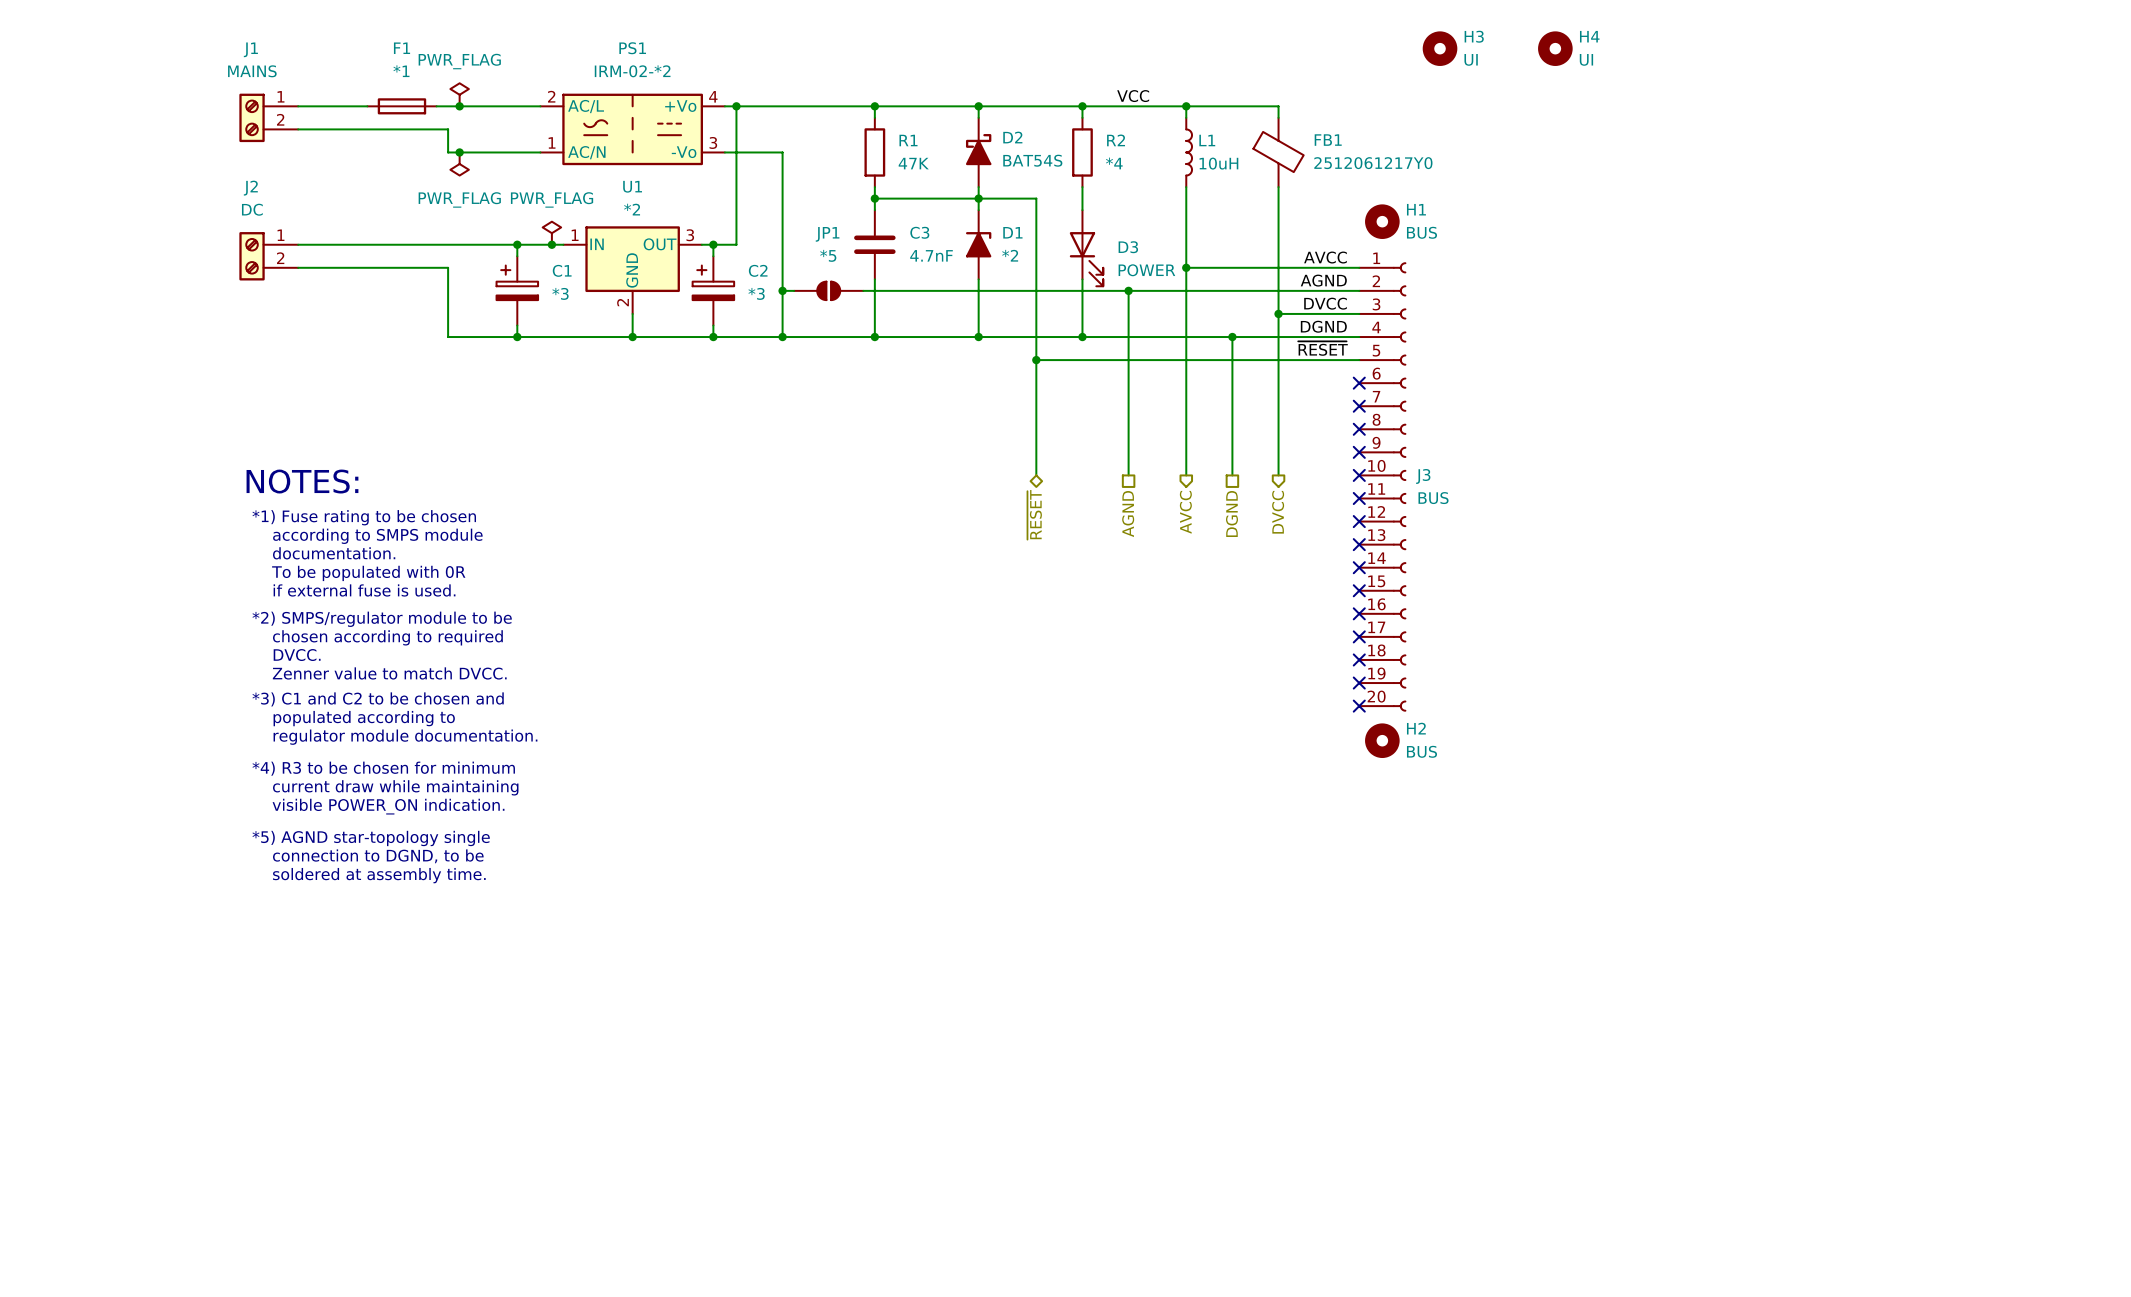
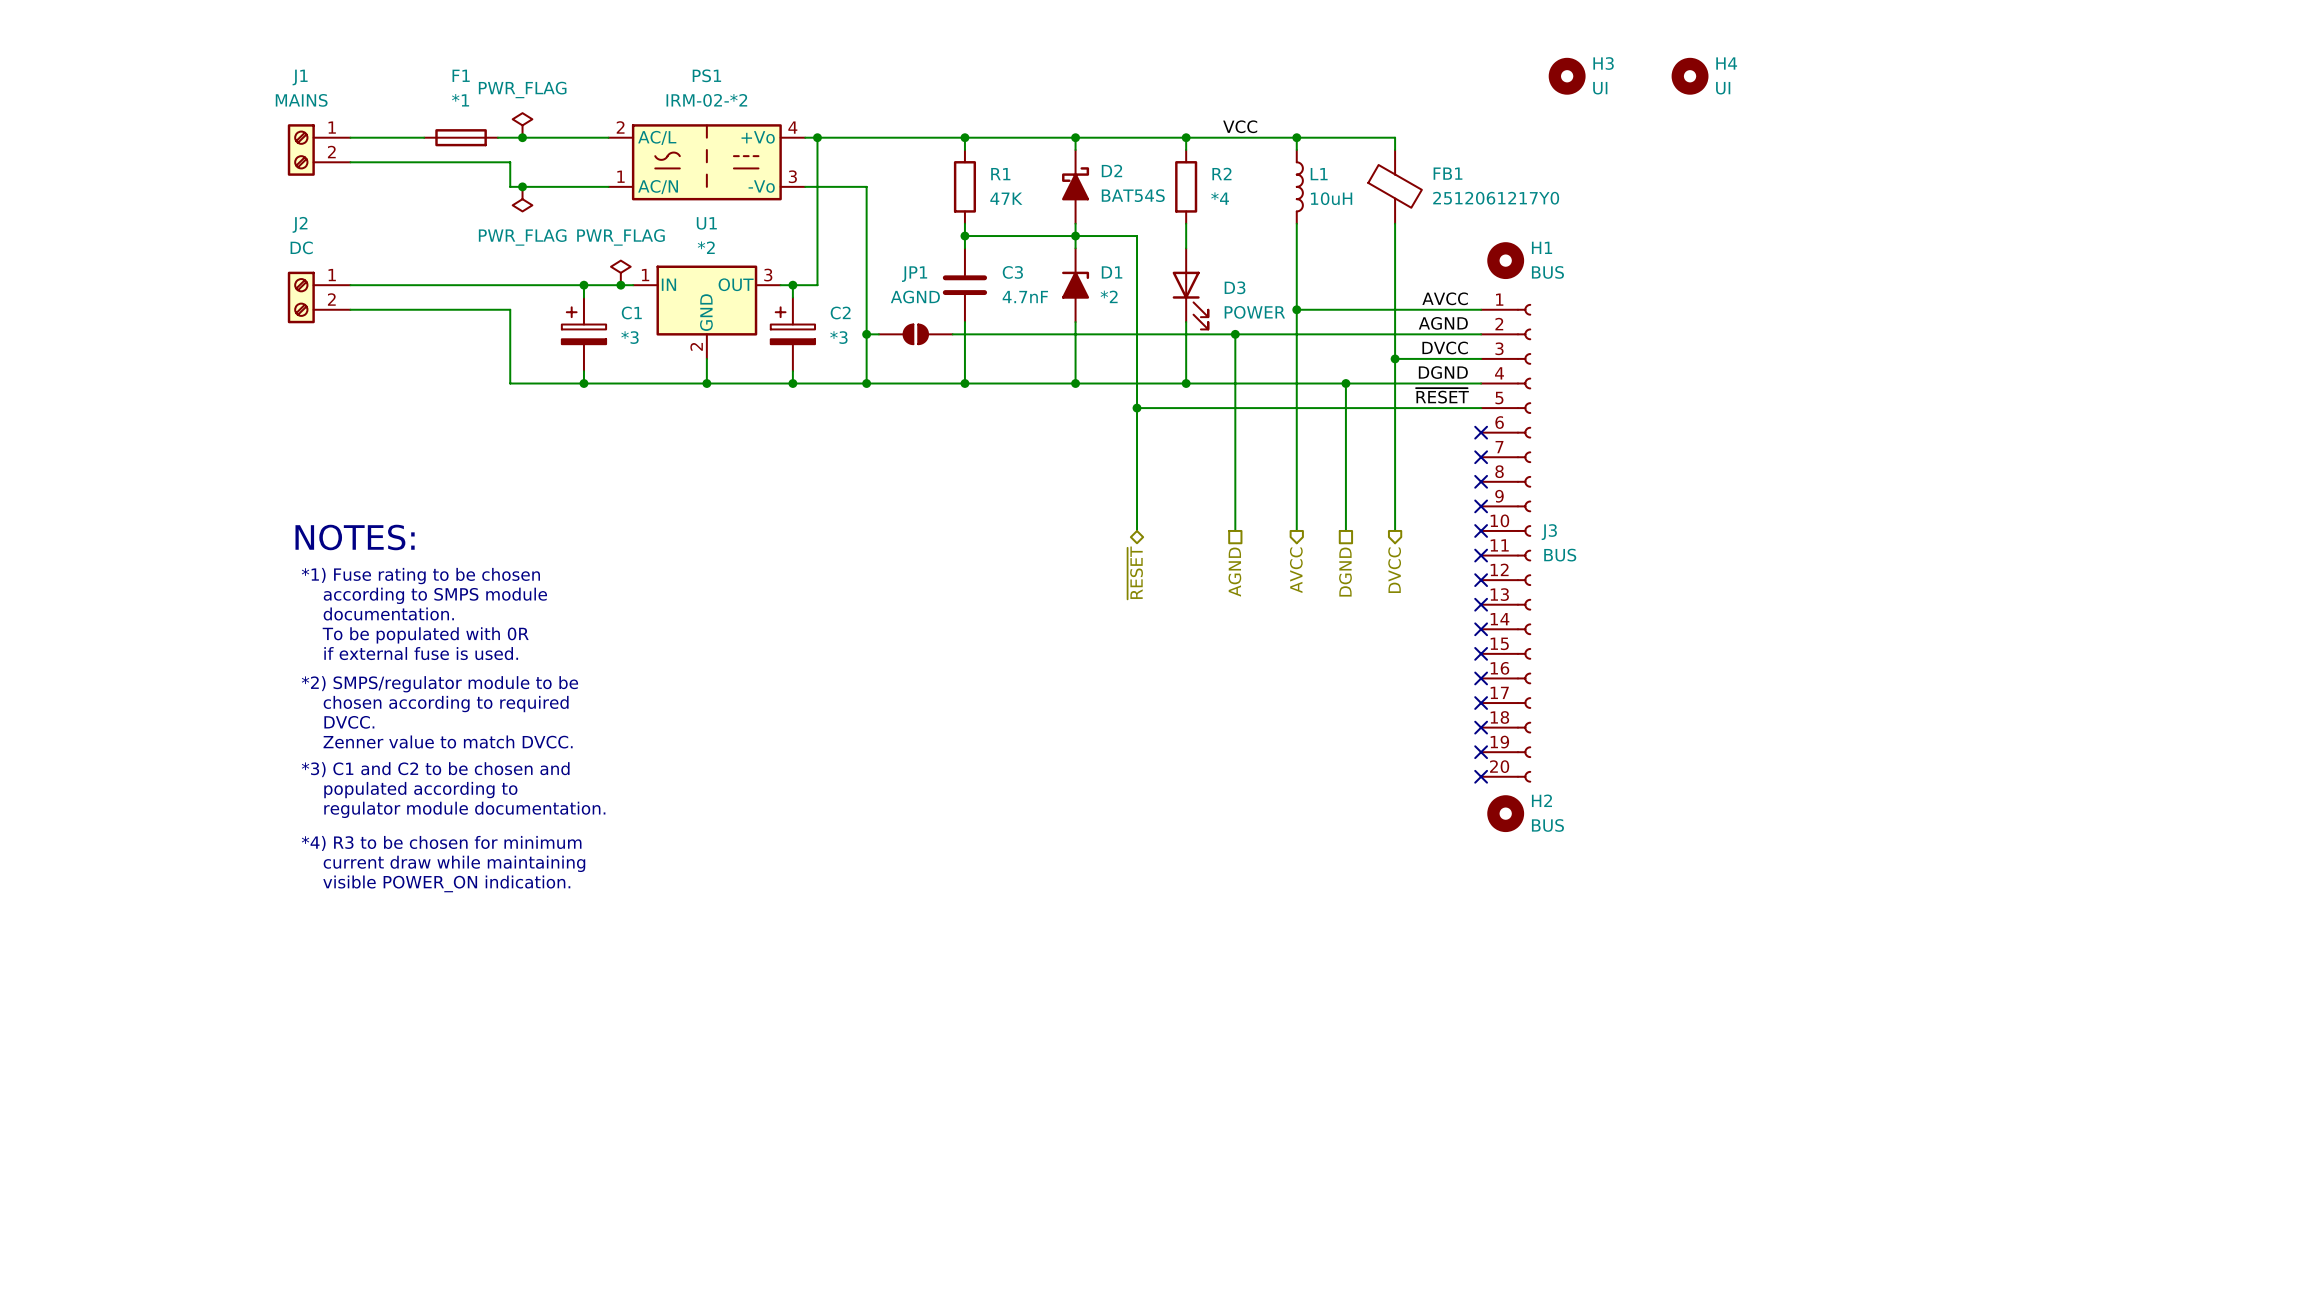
JP1 value: *5 (828, 255) -> AGND (915, 297)
text: *5) AGND star-topology single (371, 838) -> none
text: connection to DGND, to be (378, 856) -> none
text: soldered at assembly time. (379, 875) -> none

